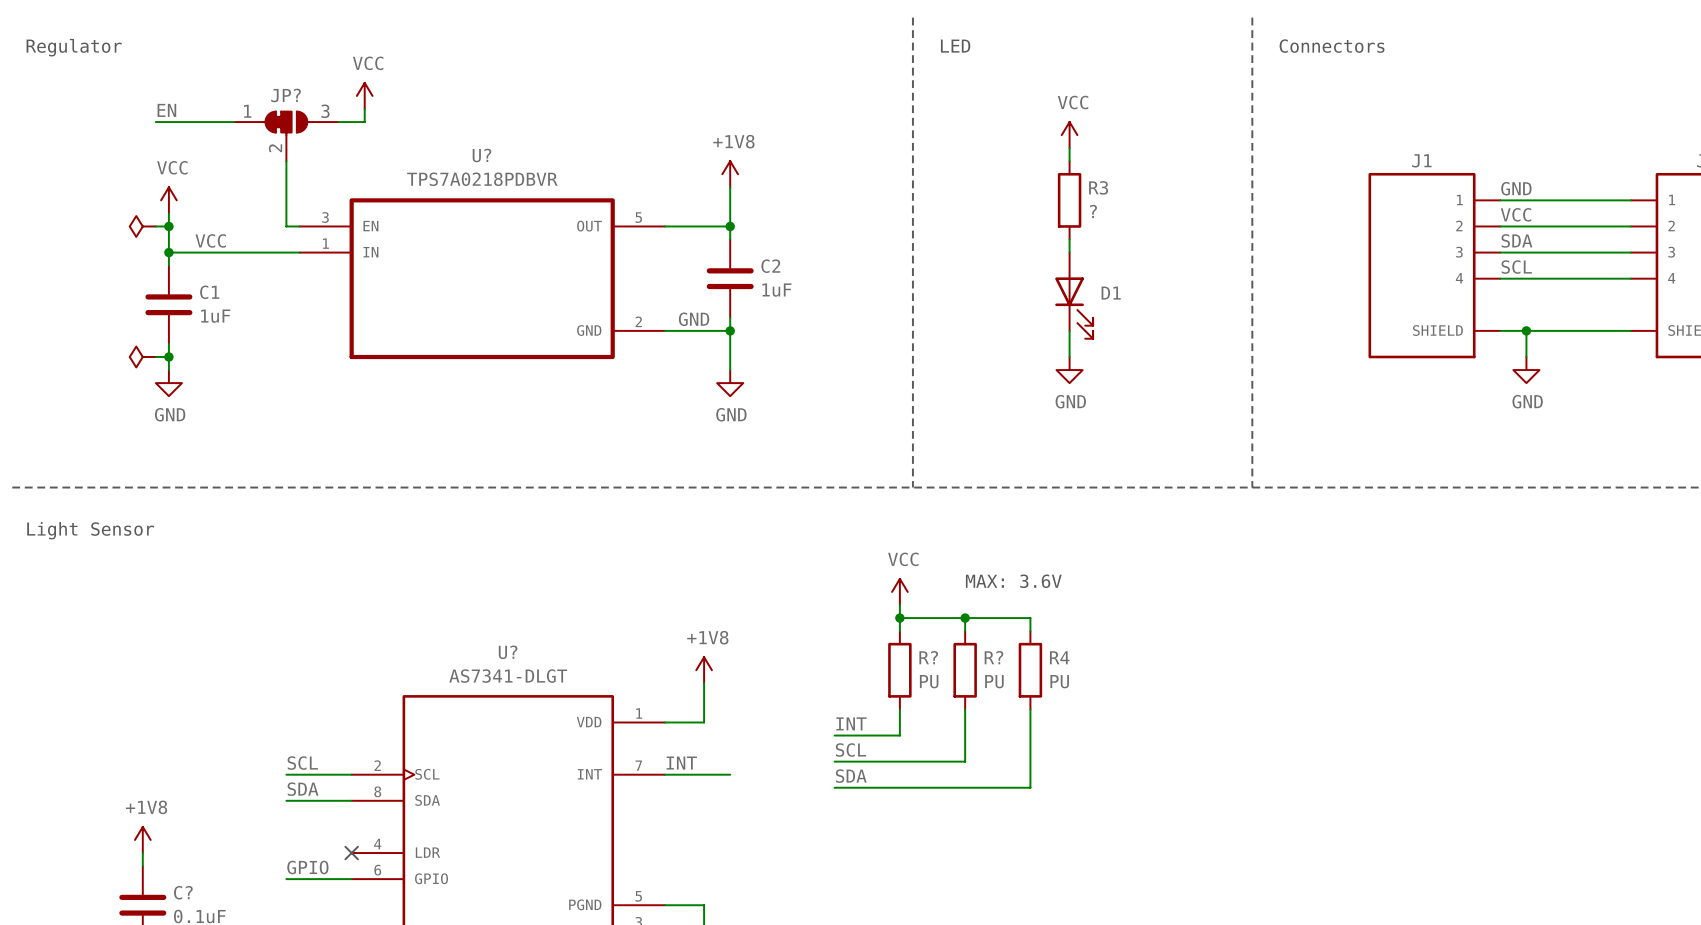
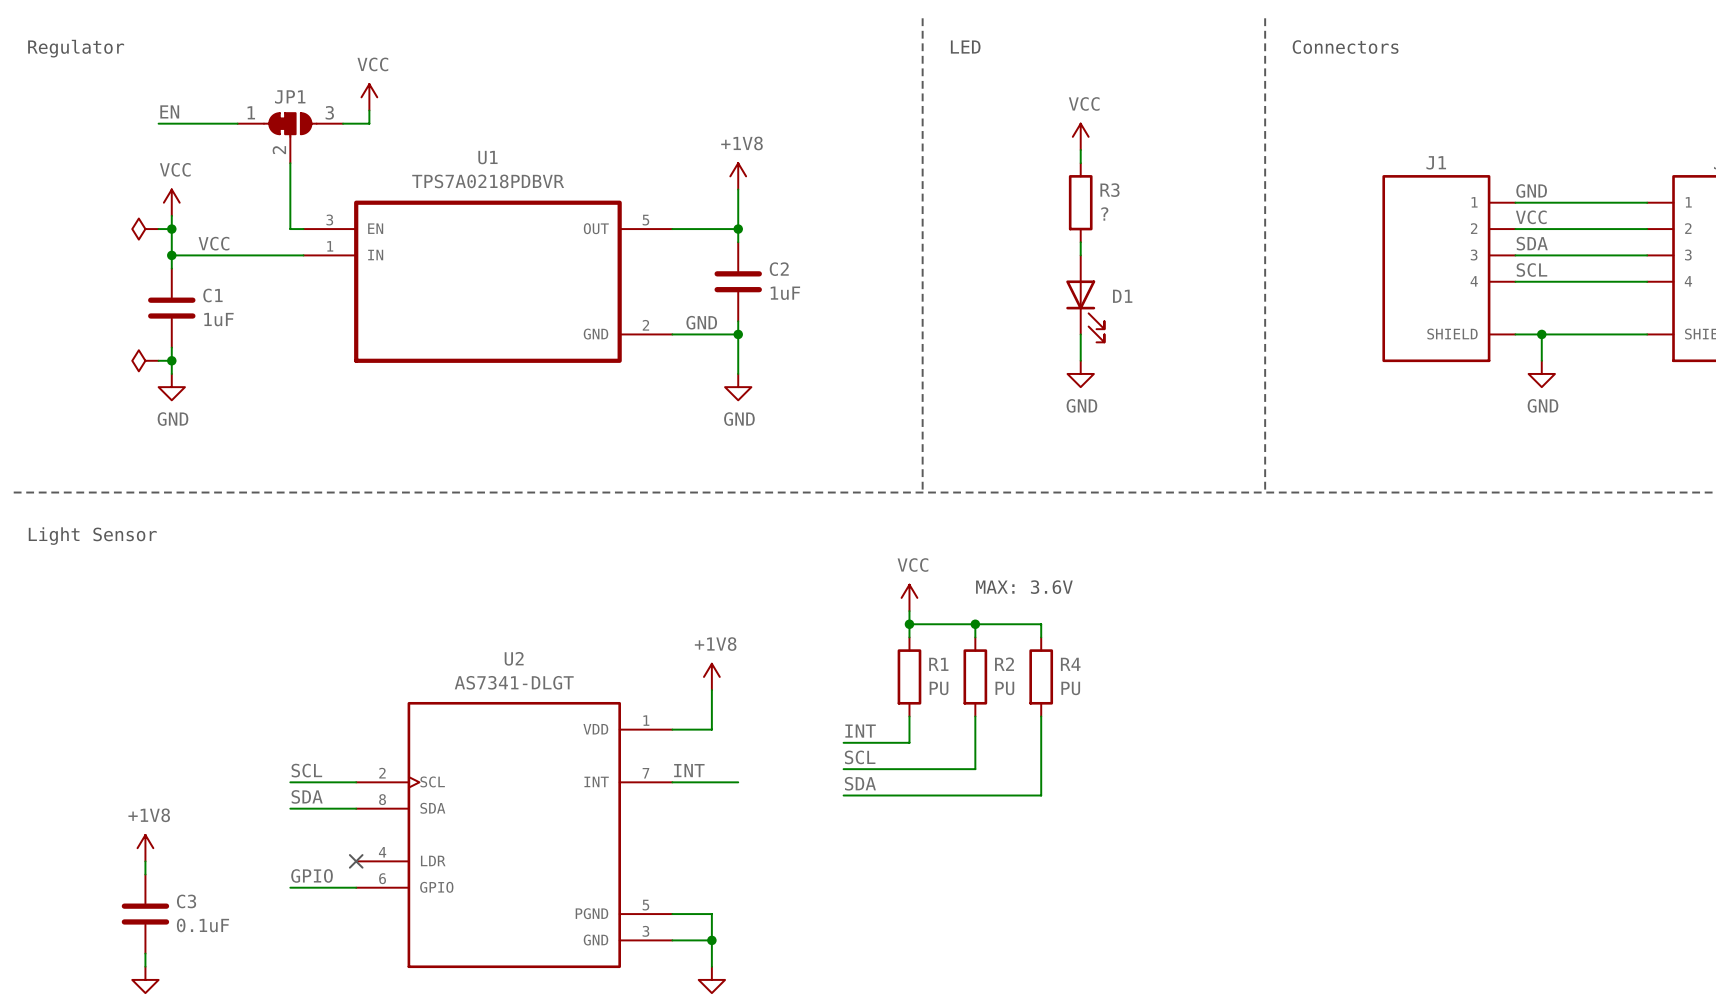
JP? name: JP? (286, 95) -> JP1 (290, 96)
U? name: U? (481, 155) -> U1 (487, 157)
U? name: U? (508, 652) -> U2 (514, 658)
R? name: R? (928, 657) -> R1 (938, 664)
R? name: R? (993, 657) -> R2 (1004, 664)
C? name: C? (183, 892) -> C3 (186, 901)

